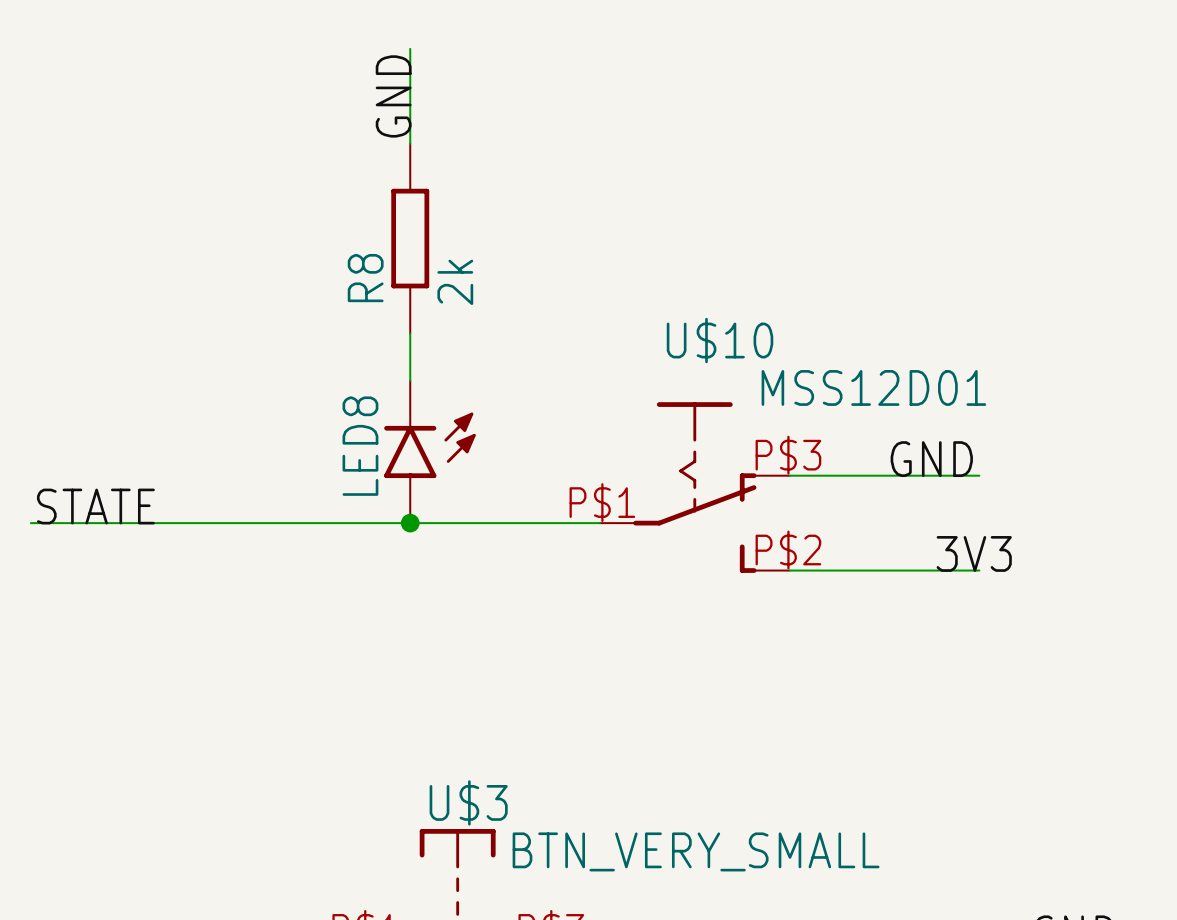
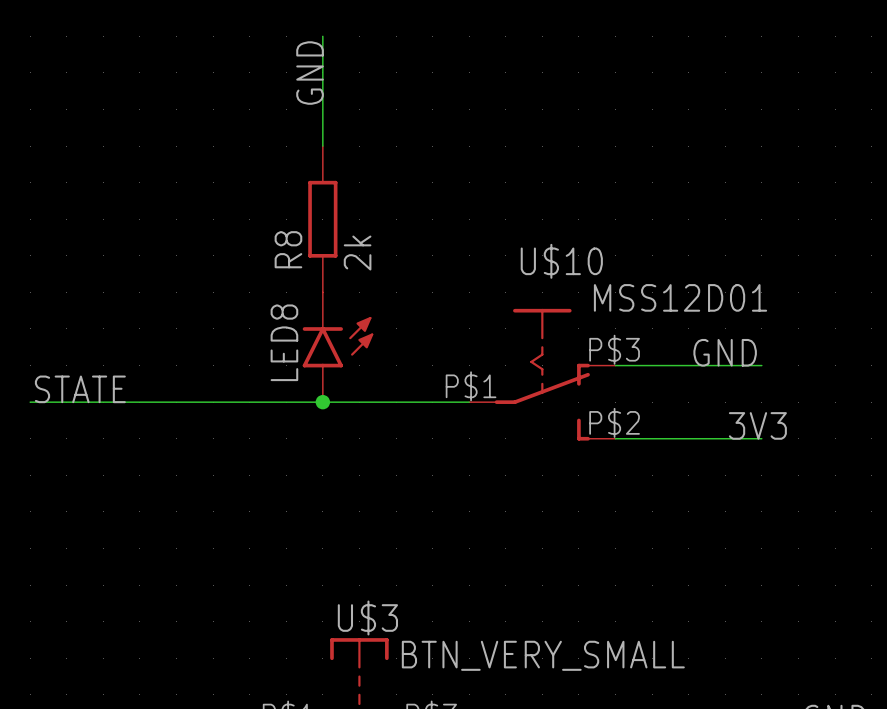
R8 position: (410, 238) -> (322, 219)

